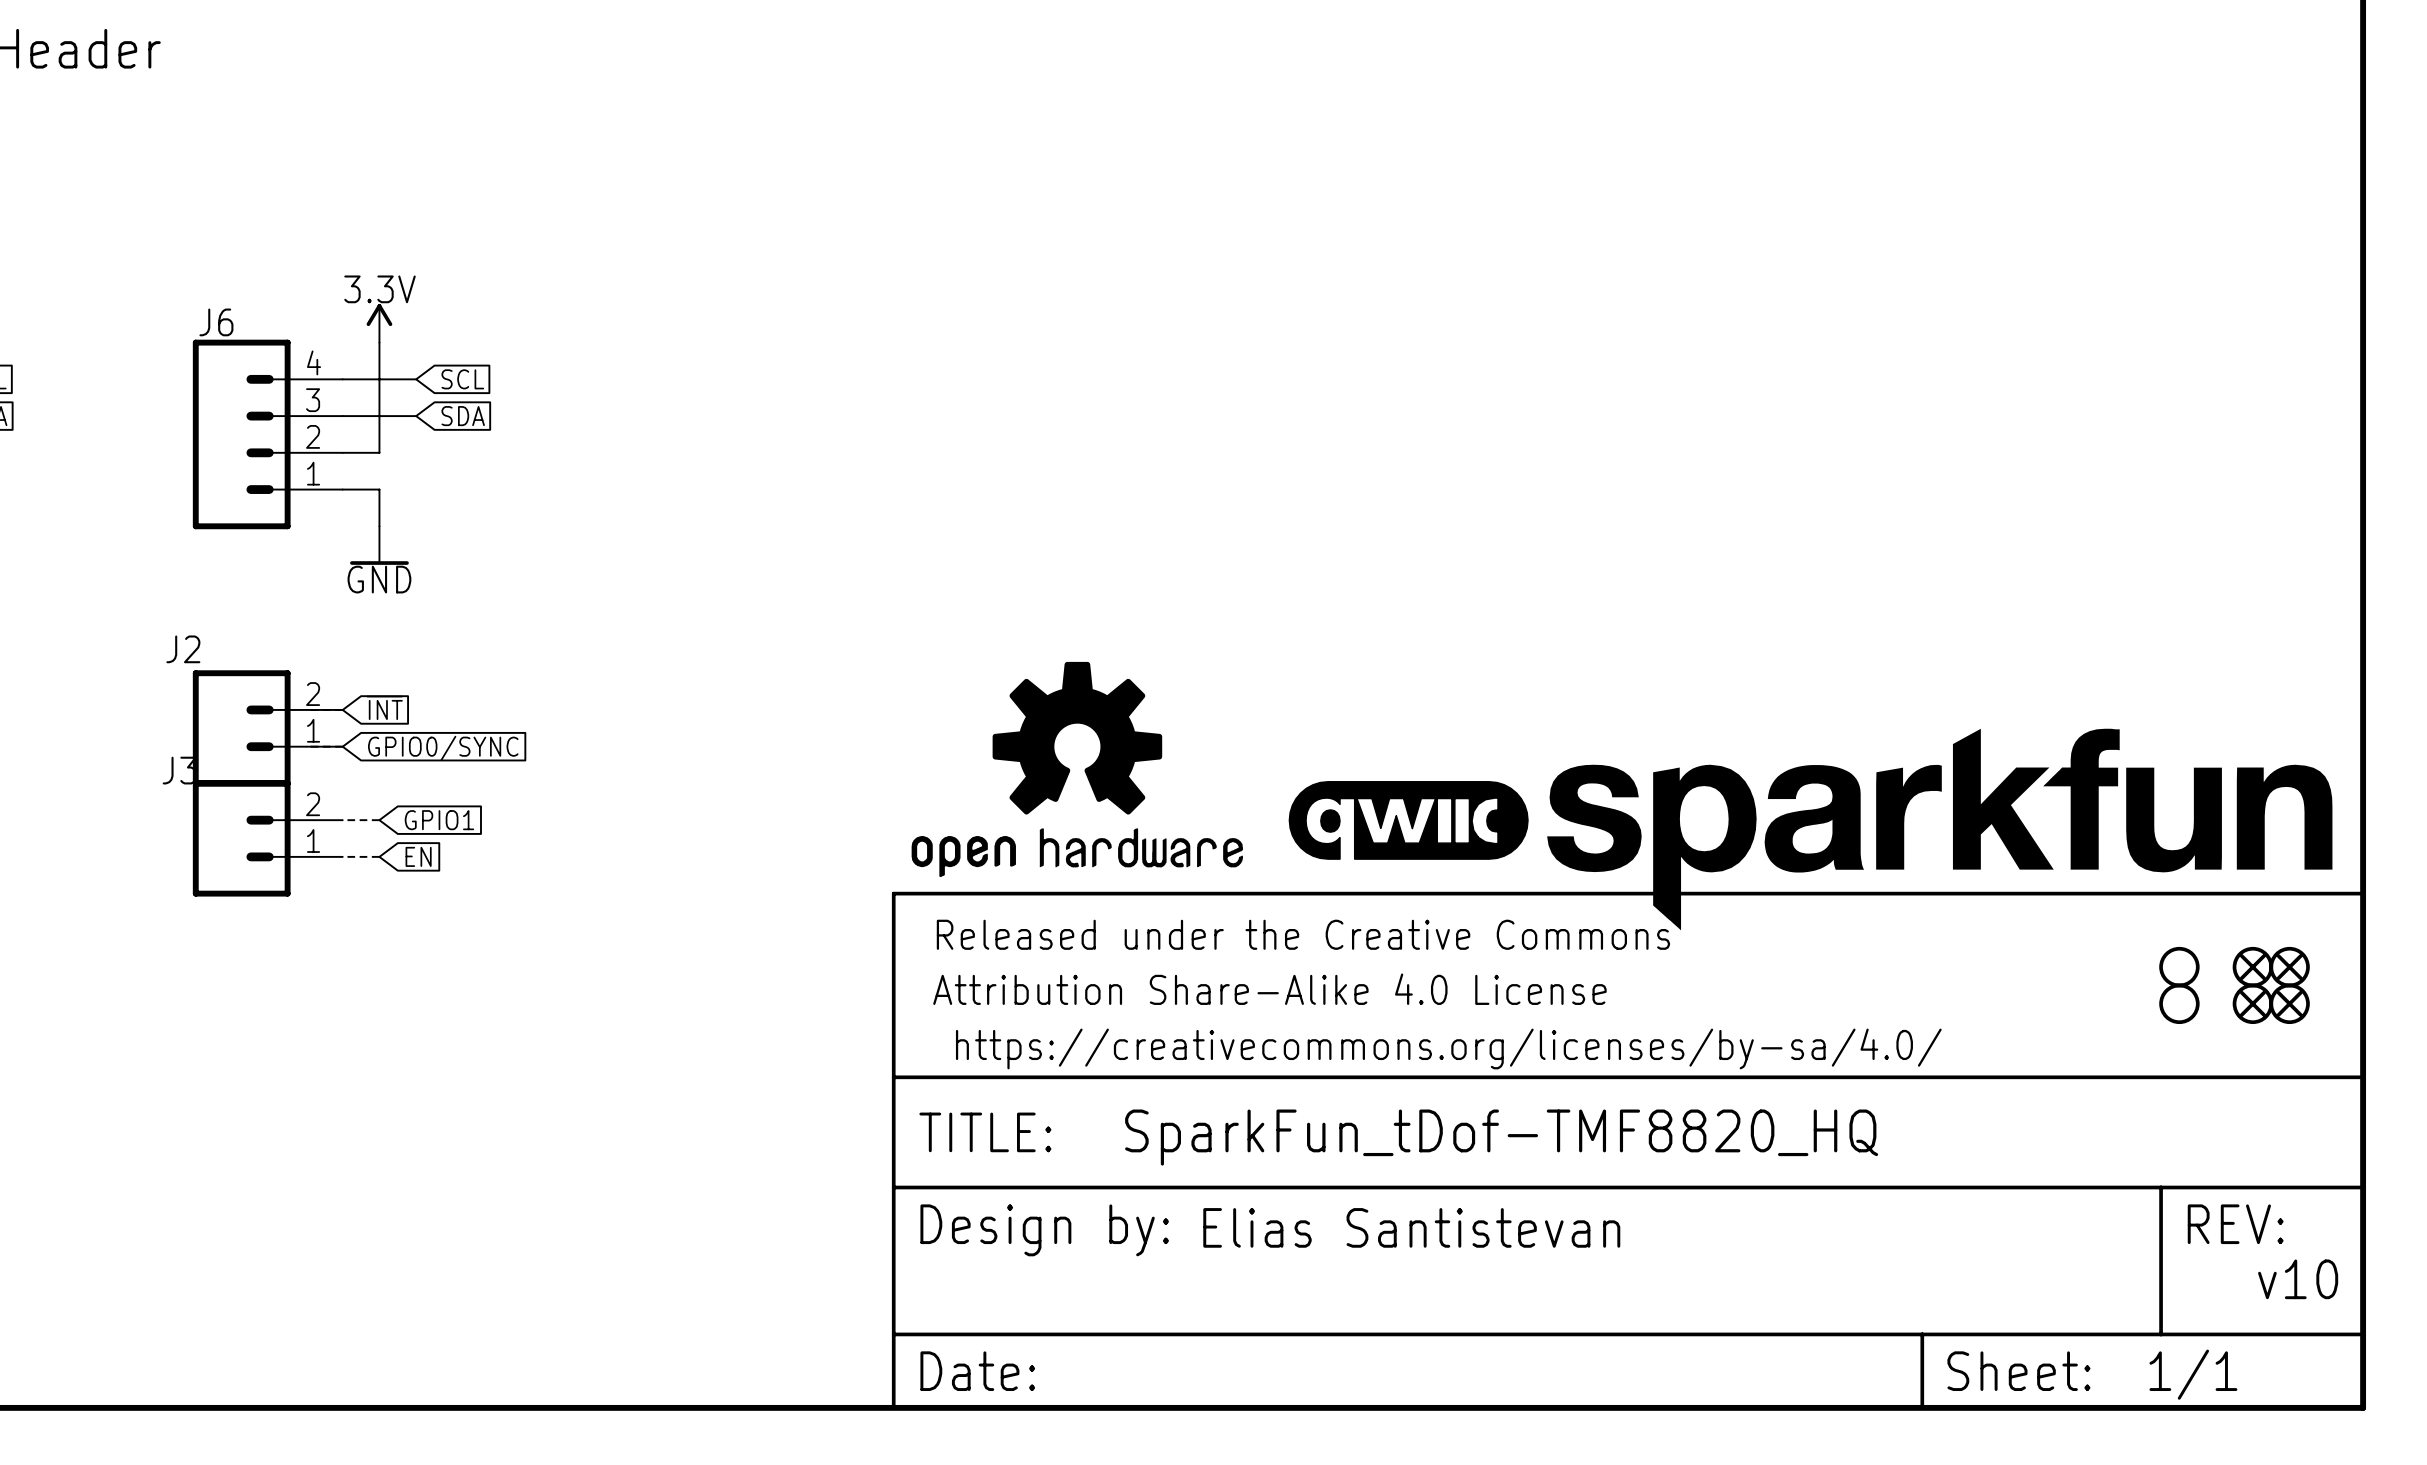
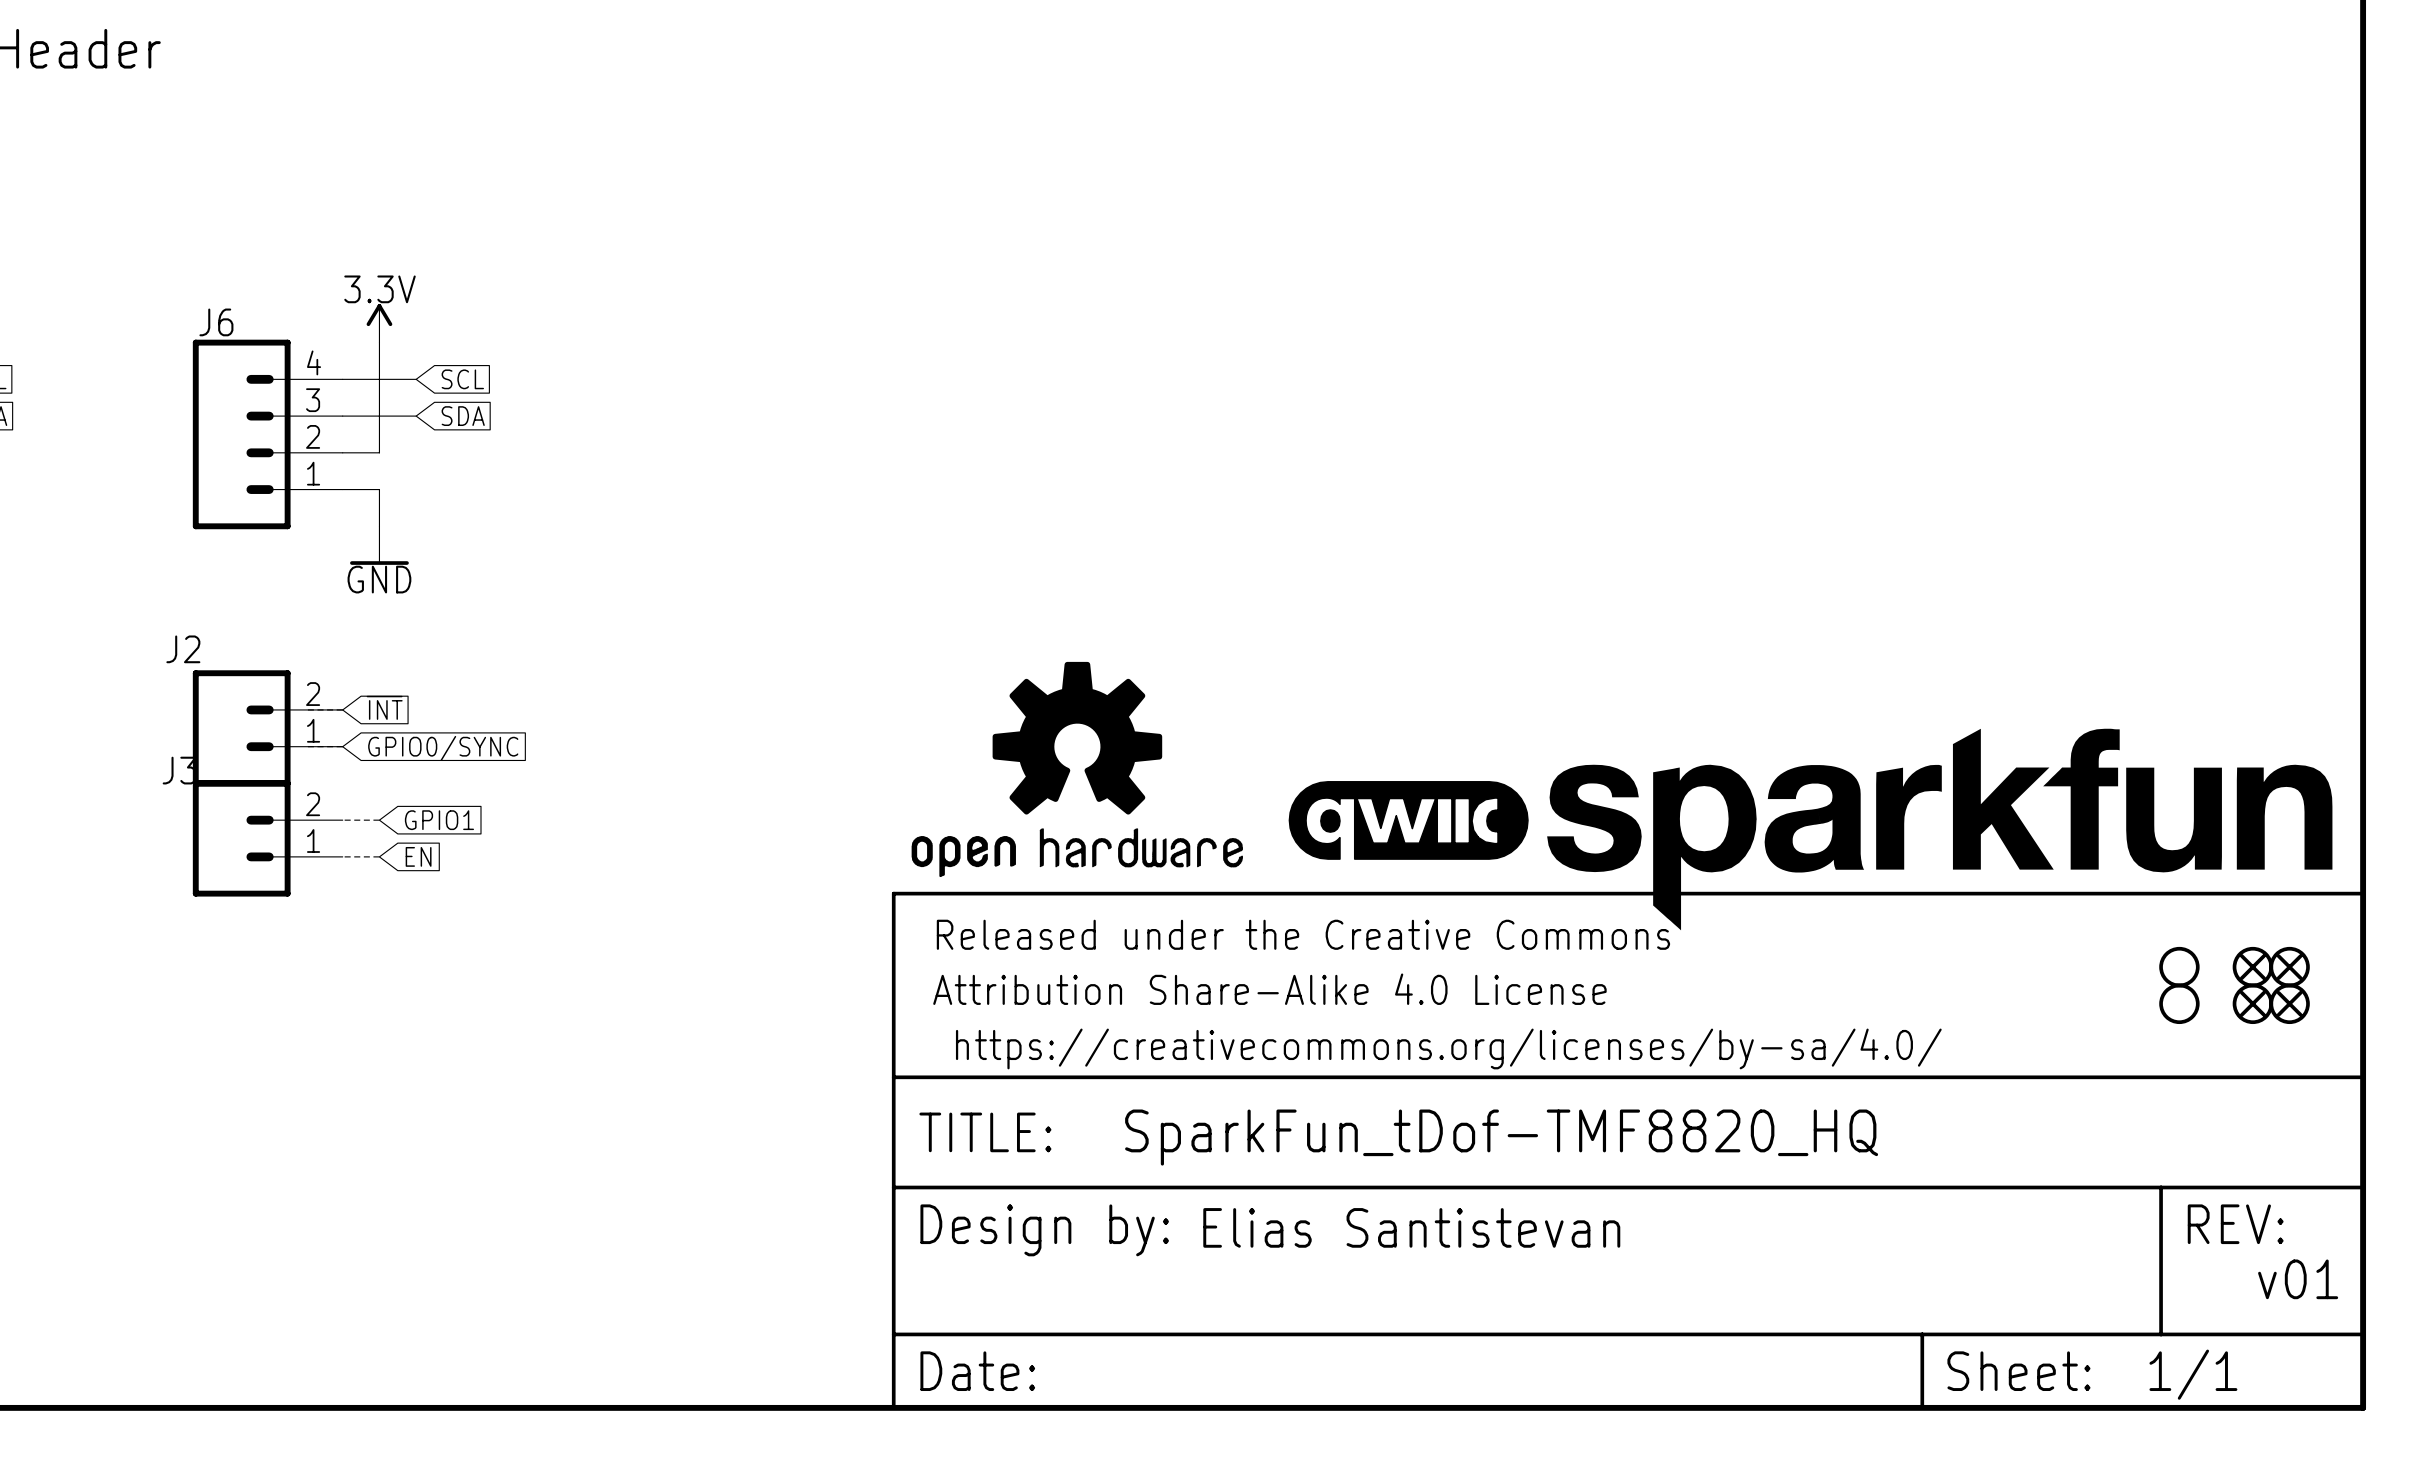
text: v10 (2298, 1279) -> v01 (2298, 1279)

